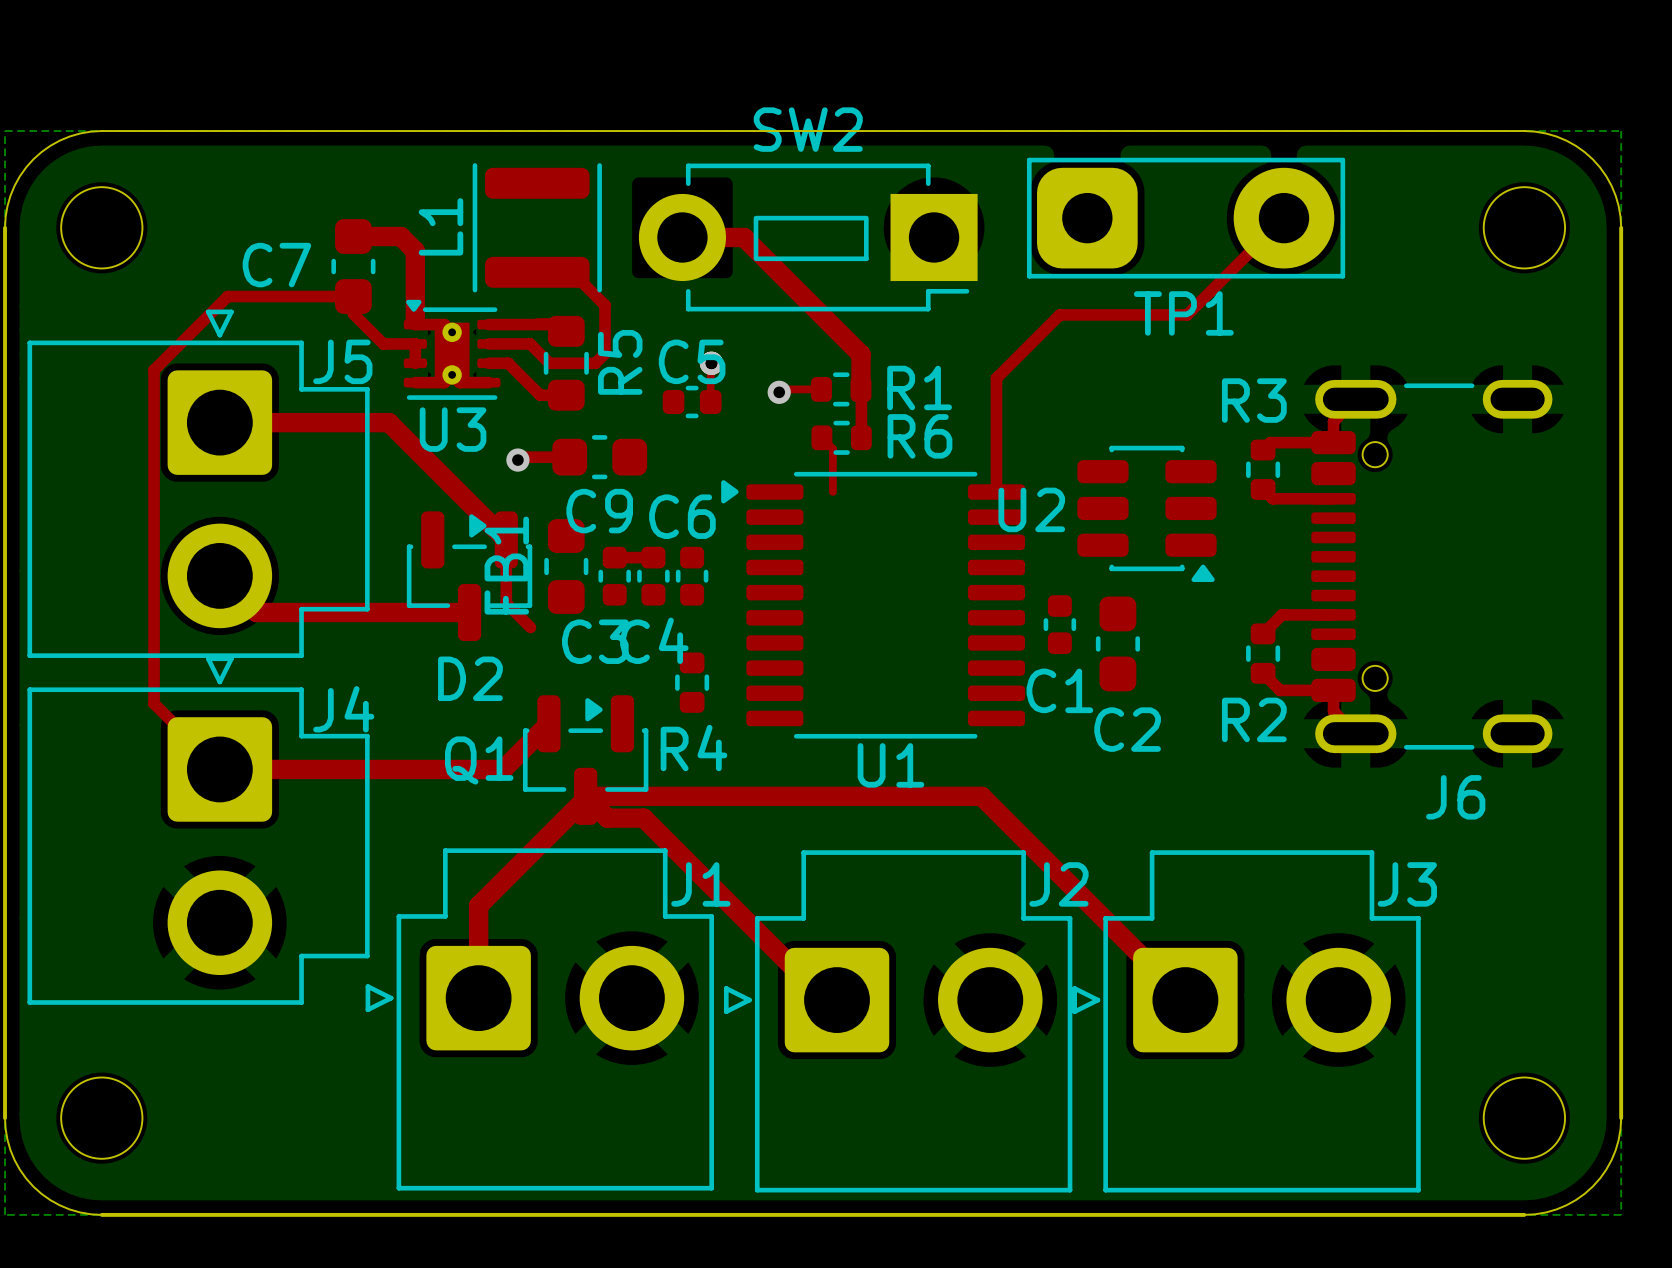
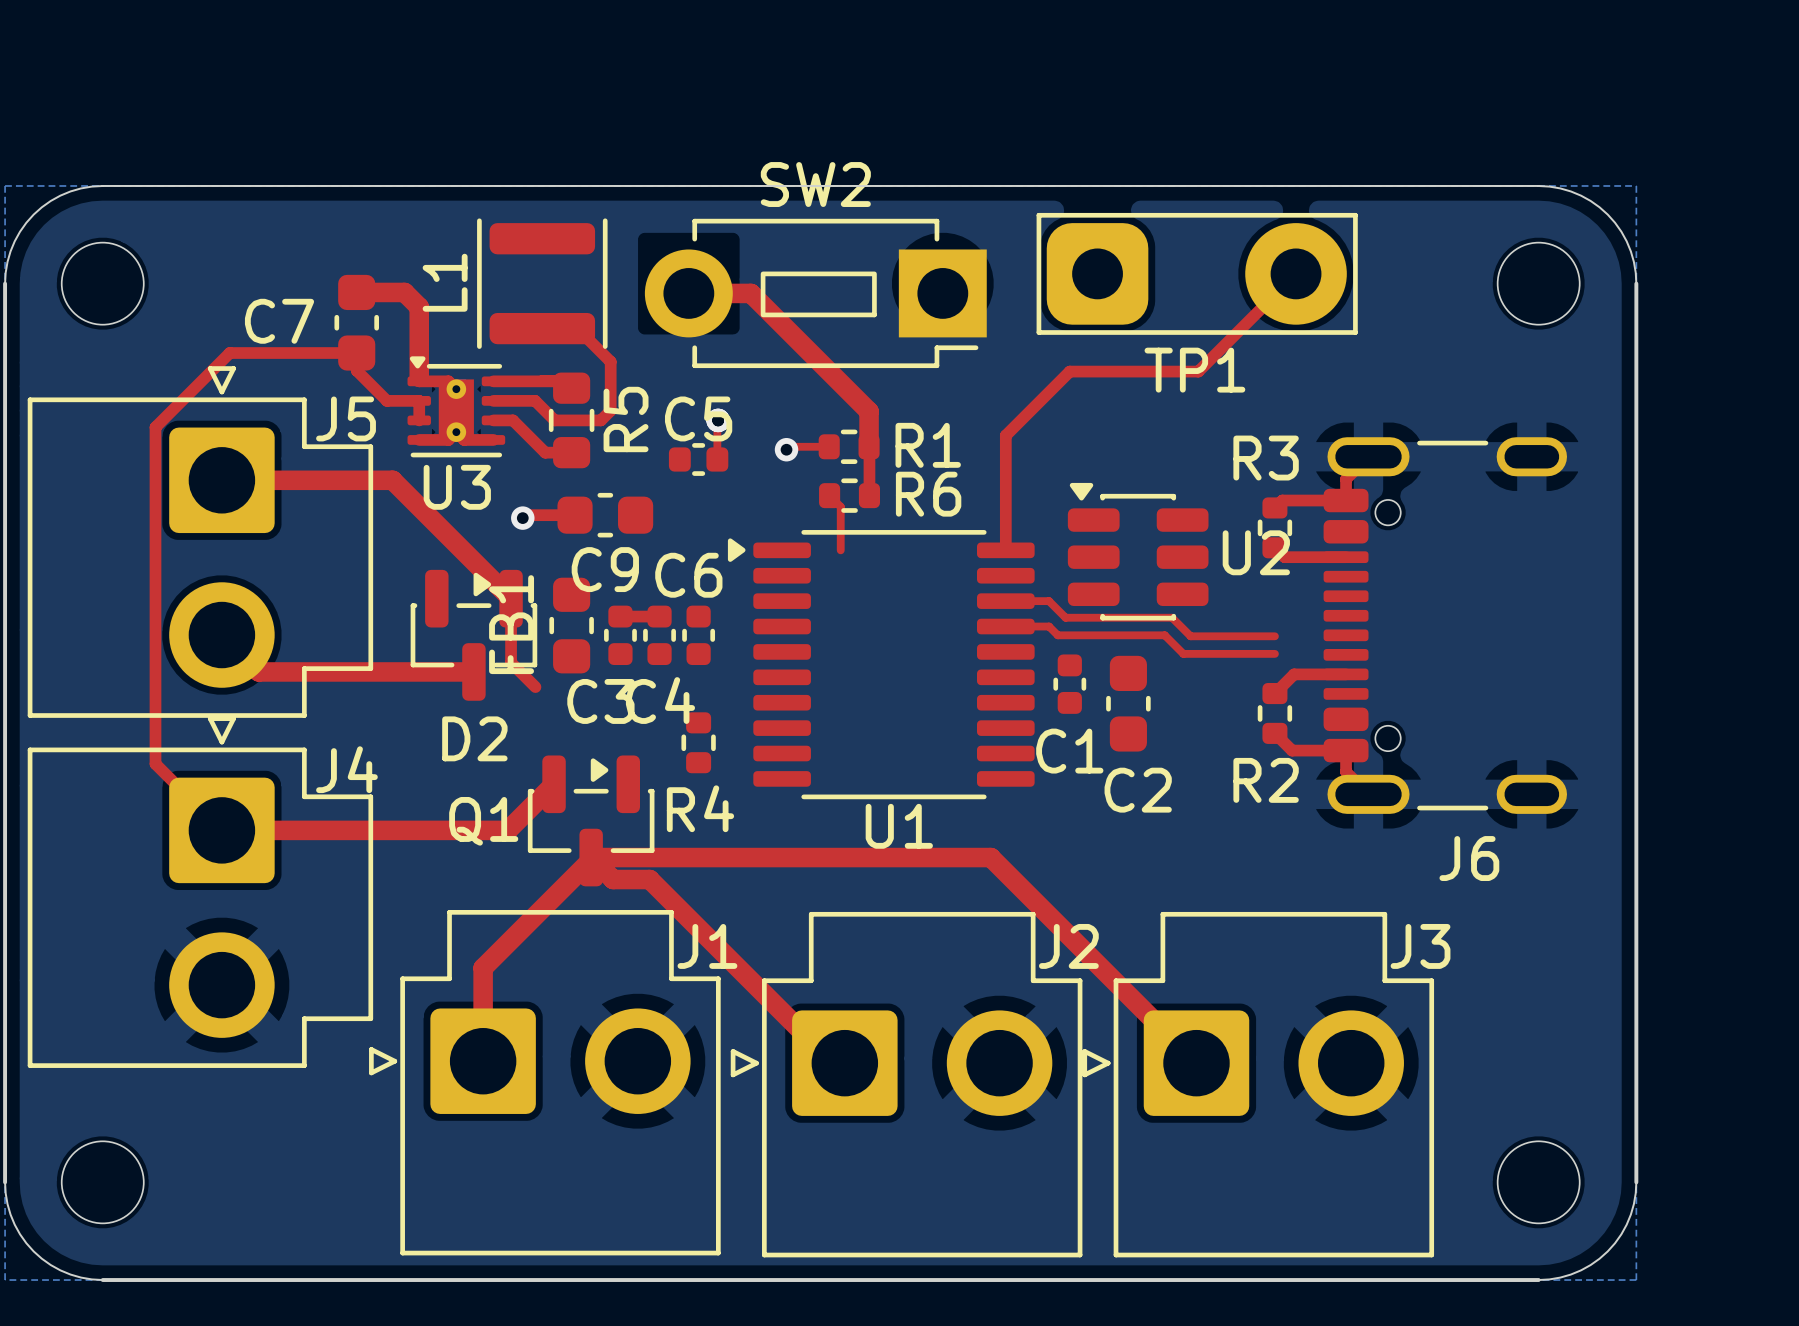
U2 rotation: 0° (1146, 513) -> 180° (1138, 551)
top track: none -> (1005, 601) (1049, 601) (1065, 617) (1172, 617) (1190, 636) (1274, 636)
top track: none -> (1005, 626) (1049, 626) (1057, 635) (1164, 635) (1183, 653) (1274, 653)

